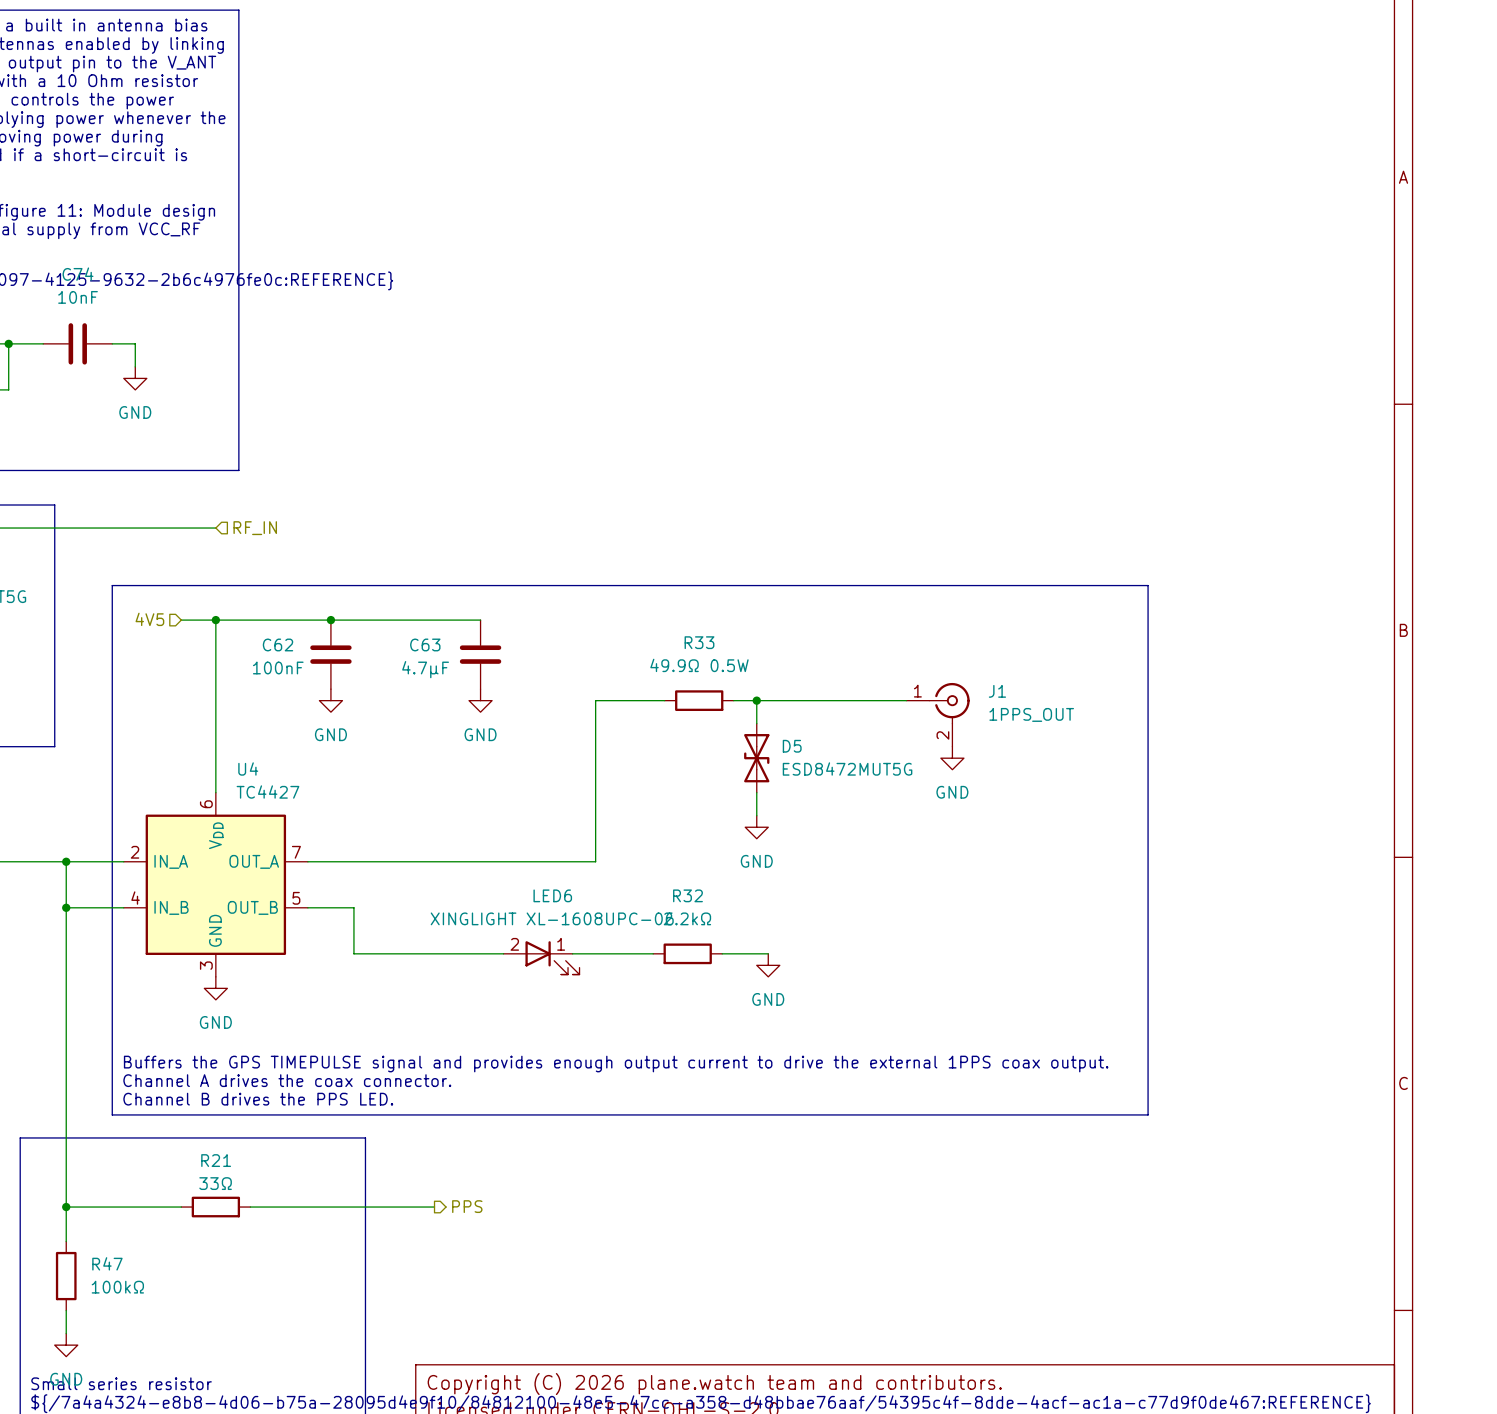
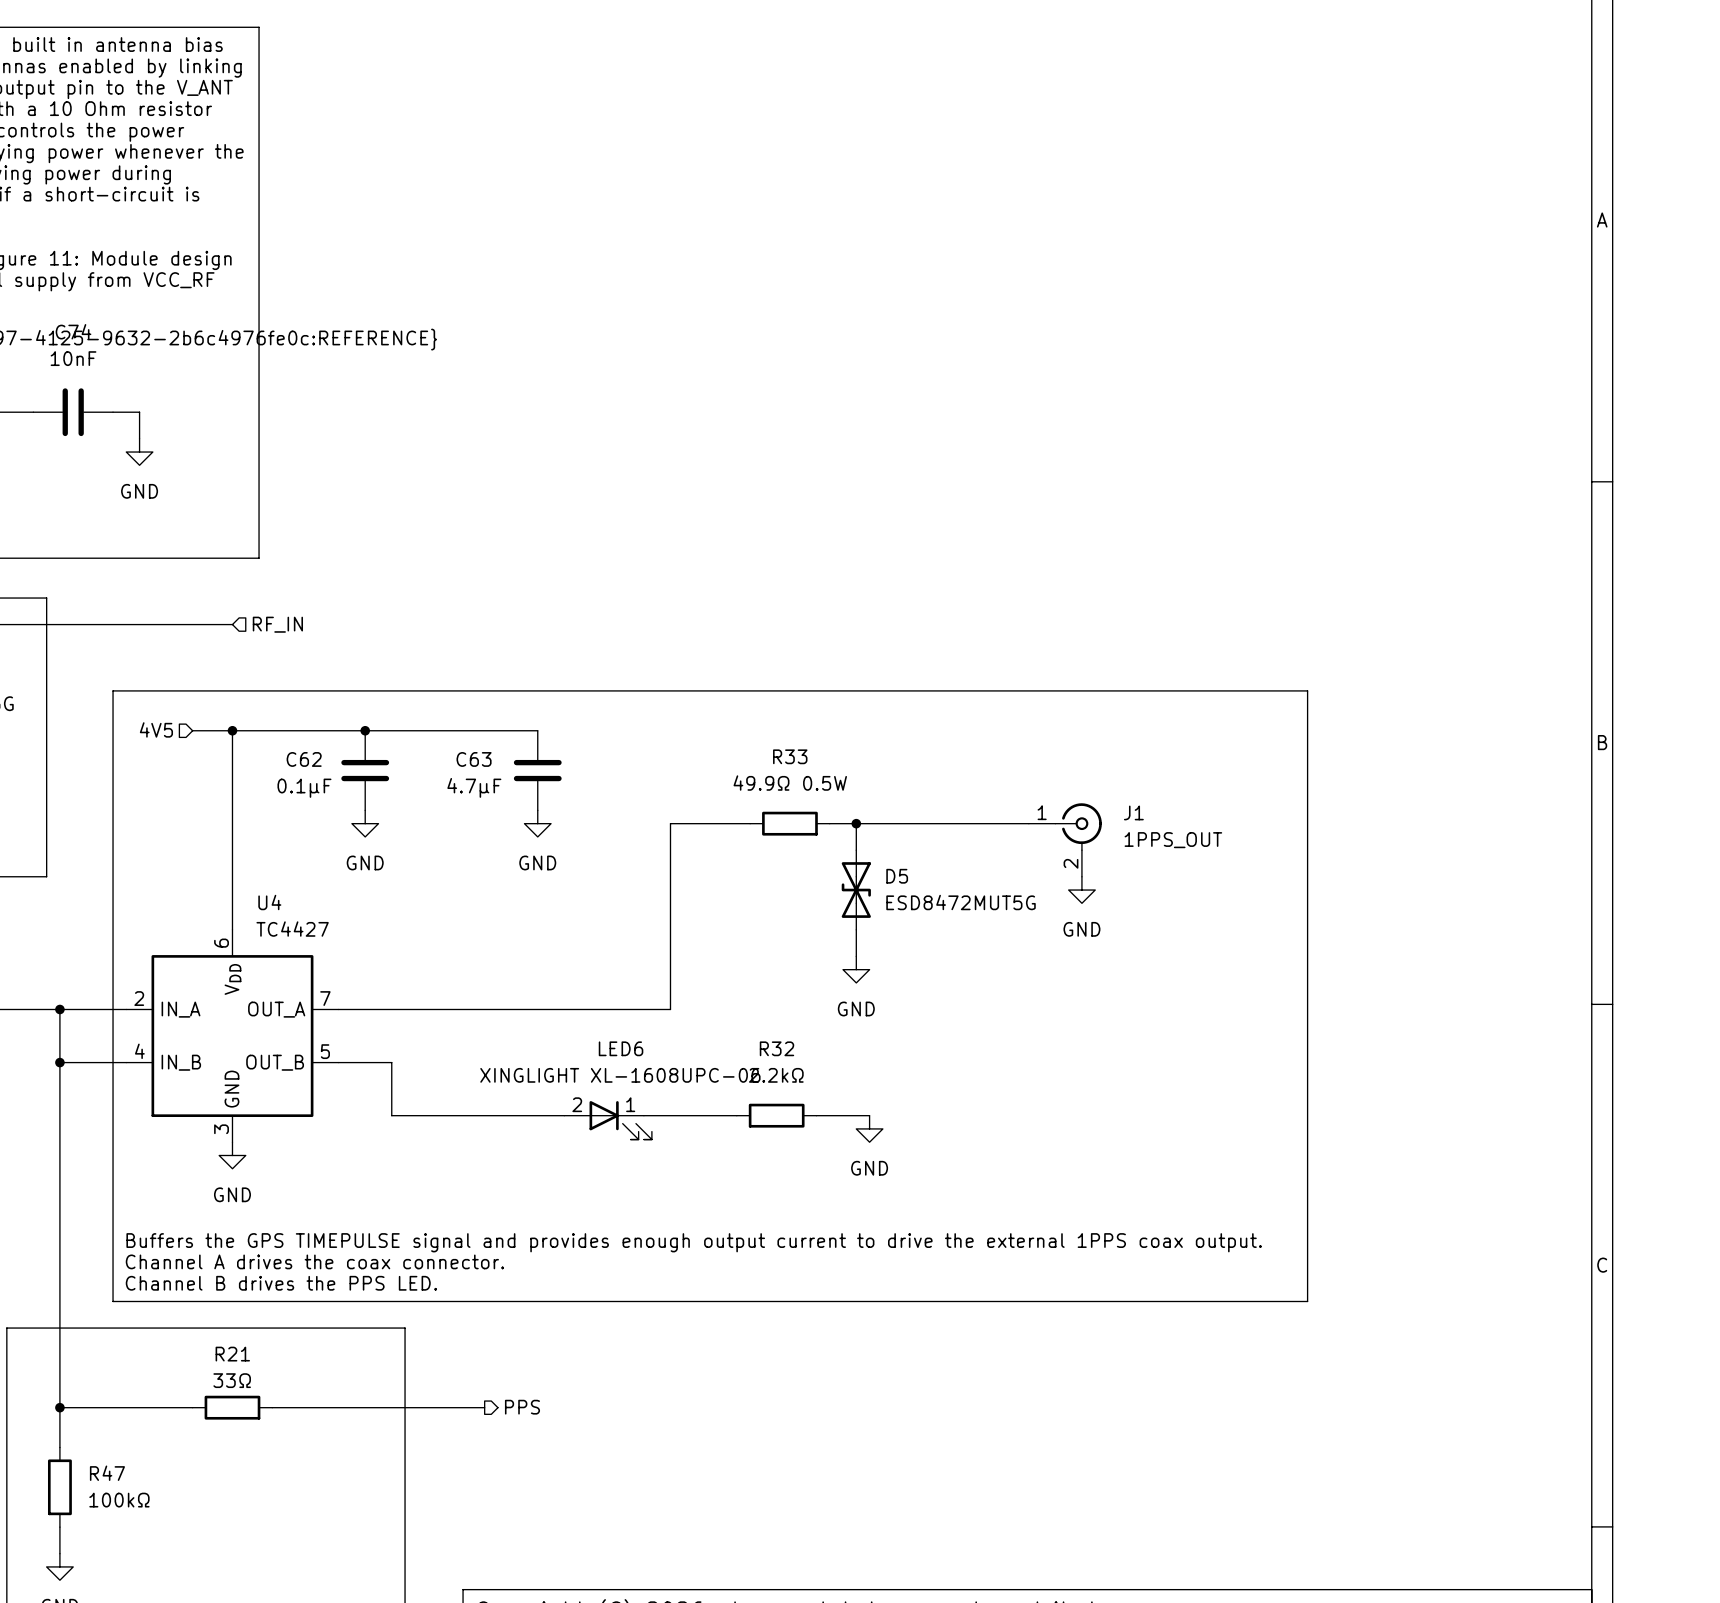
C62 value: 100nF (278, 667) -> 0.1µF (304, 788)

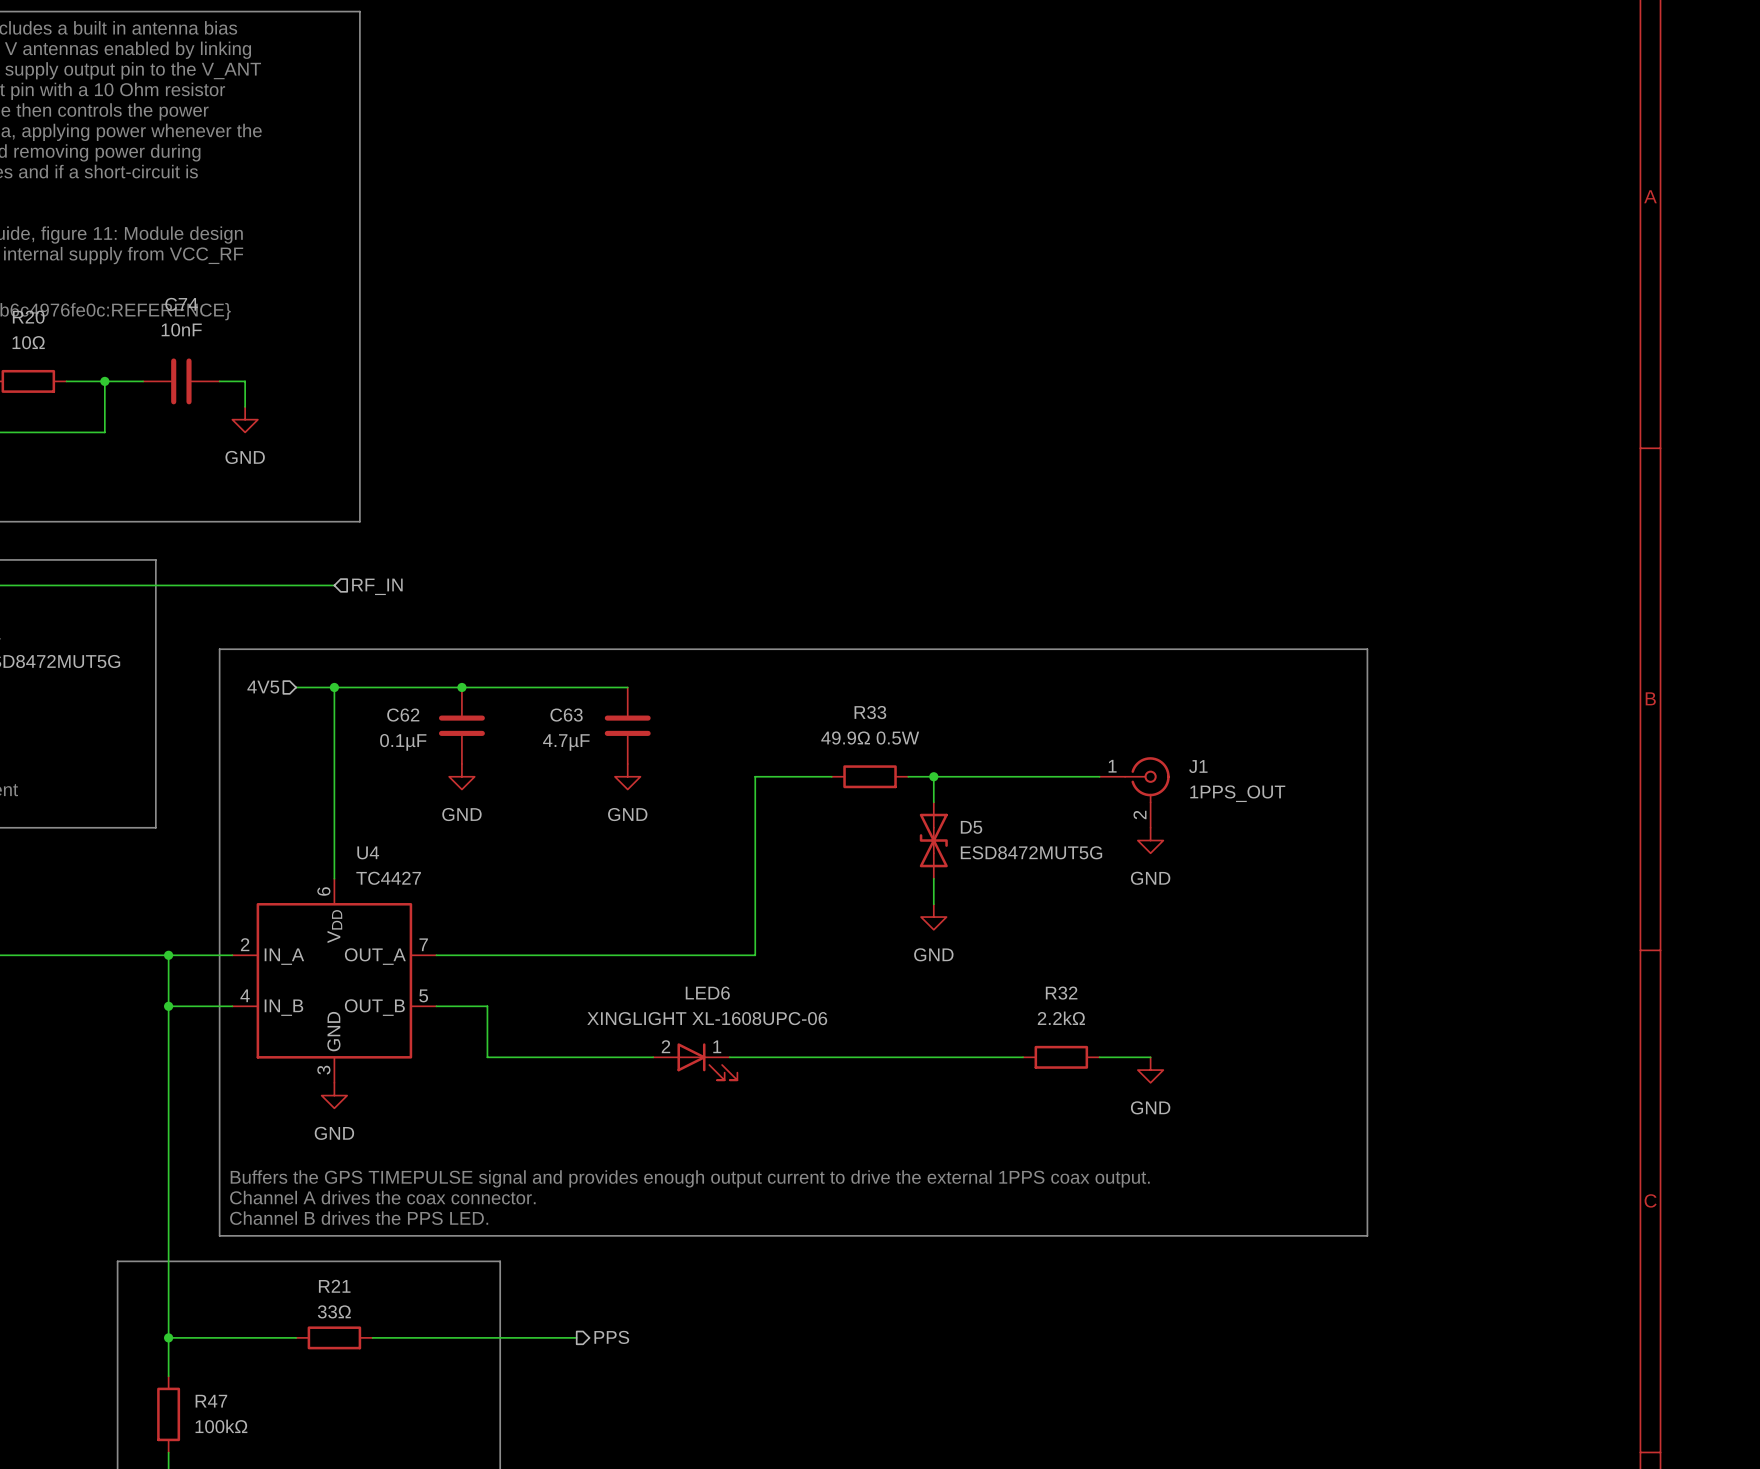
wire: none -> (819, 1057) (895, 1057)
R32 position: (776, 1115) -> (1061, 1057)
wire: none -> (946, 1057) (1023, 1057)
wire: none -> (1099, 1057) (1150, 1057)
power symbol position: GND (869, 1128) -> GND (1150, 1070)

